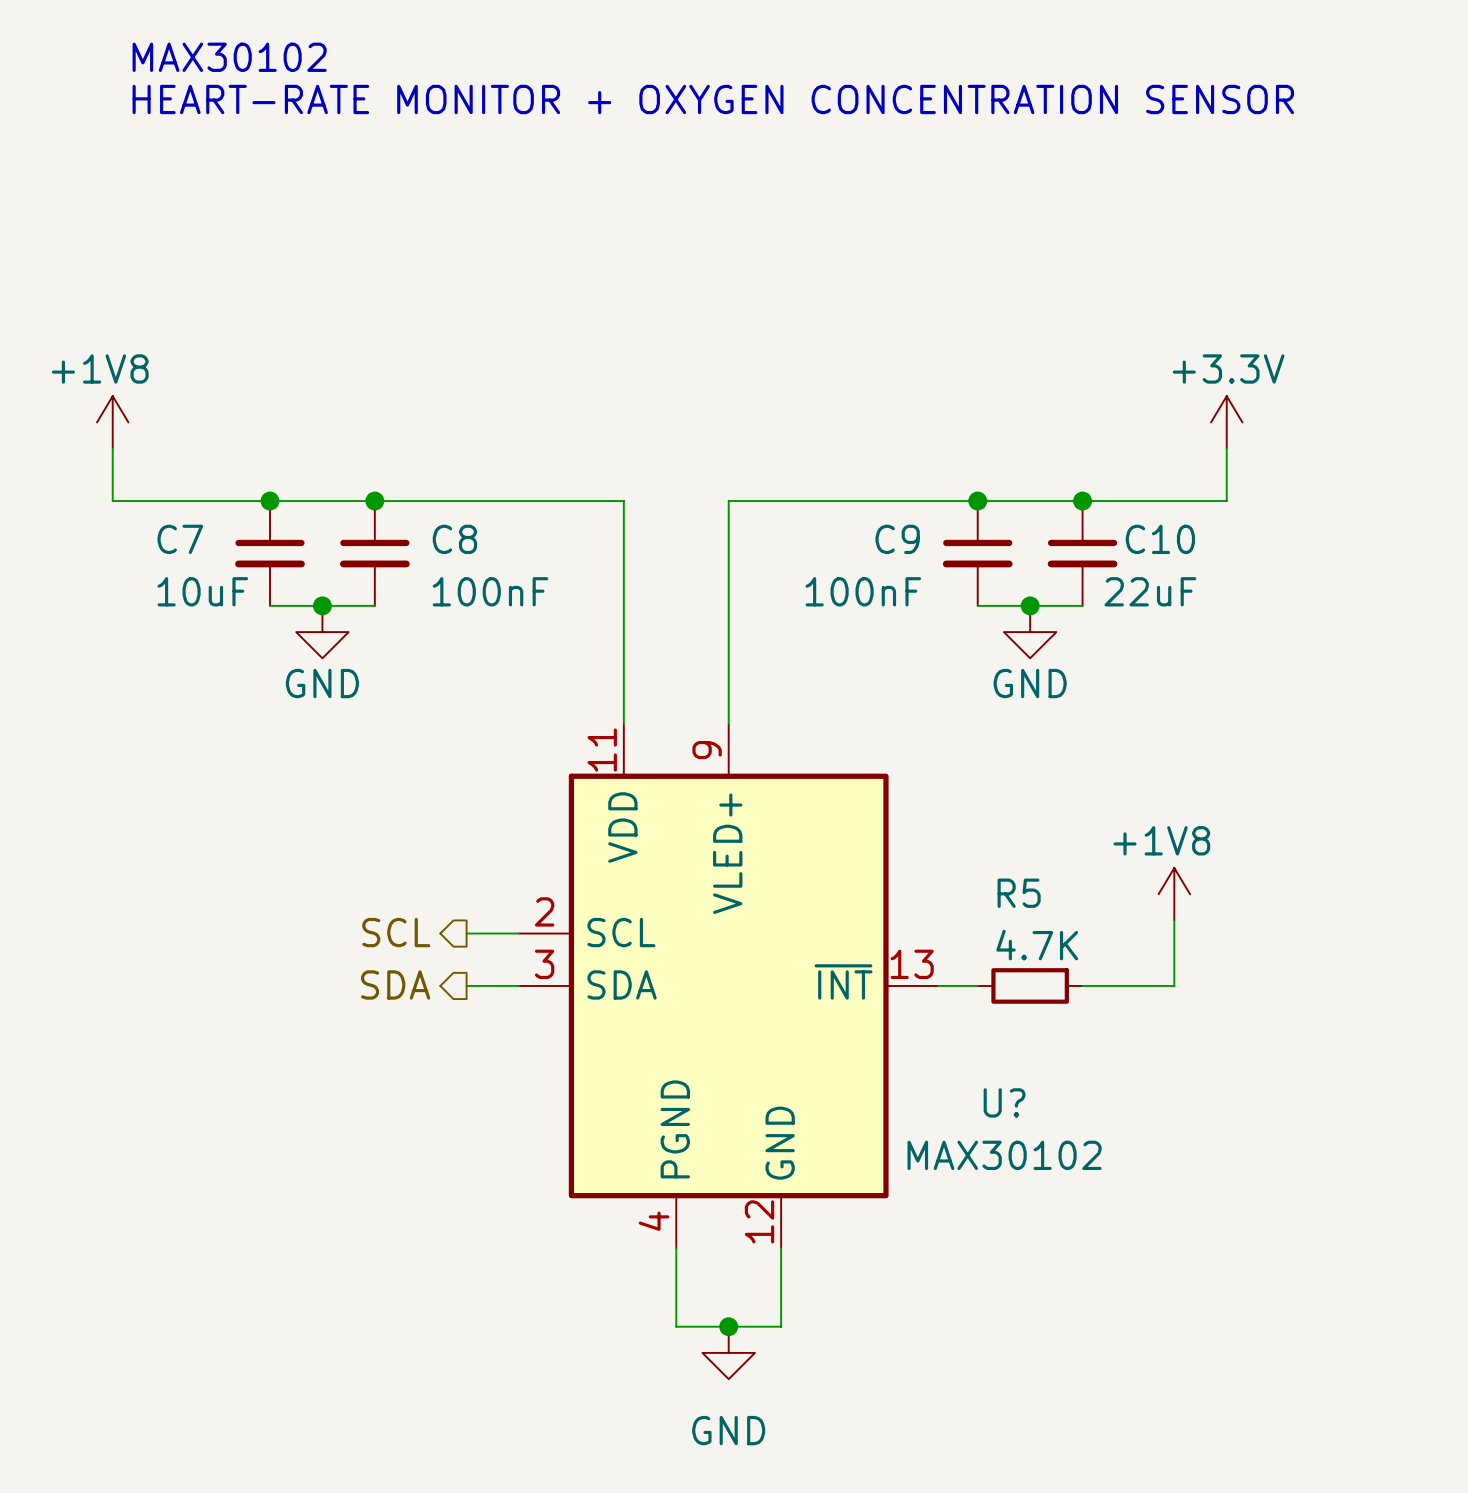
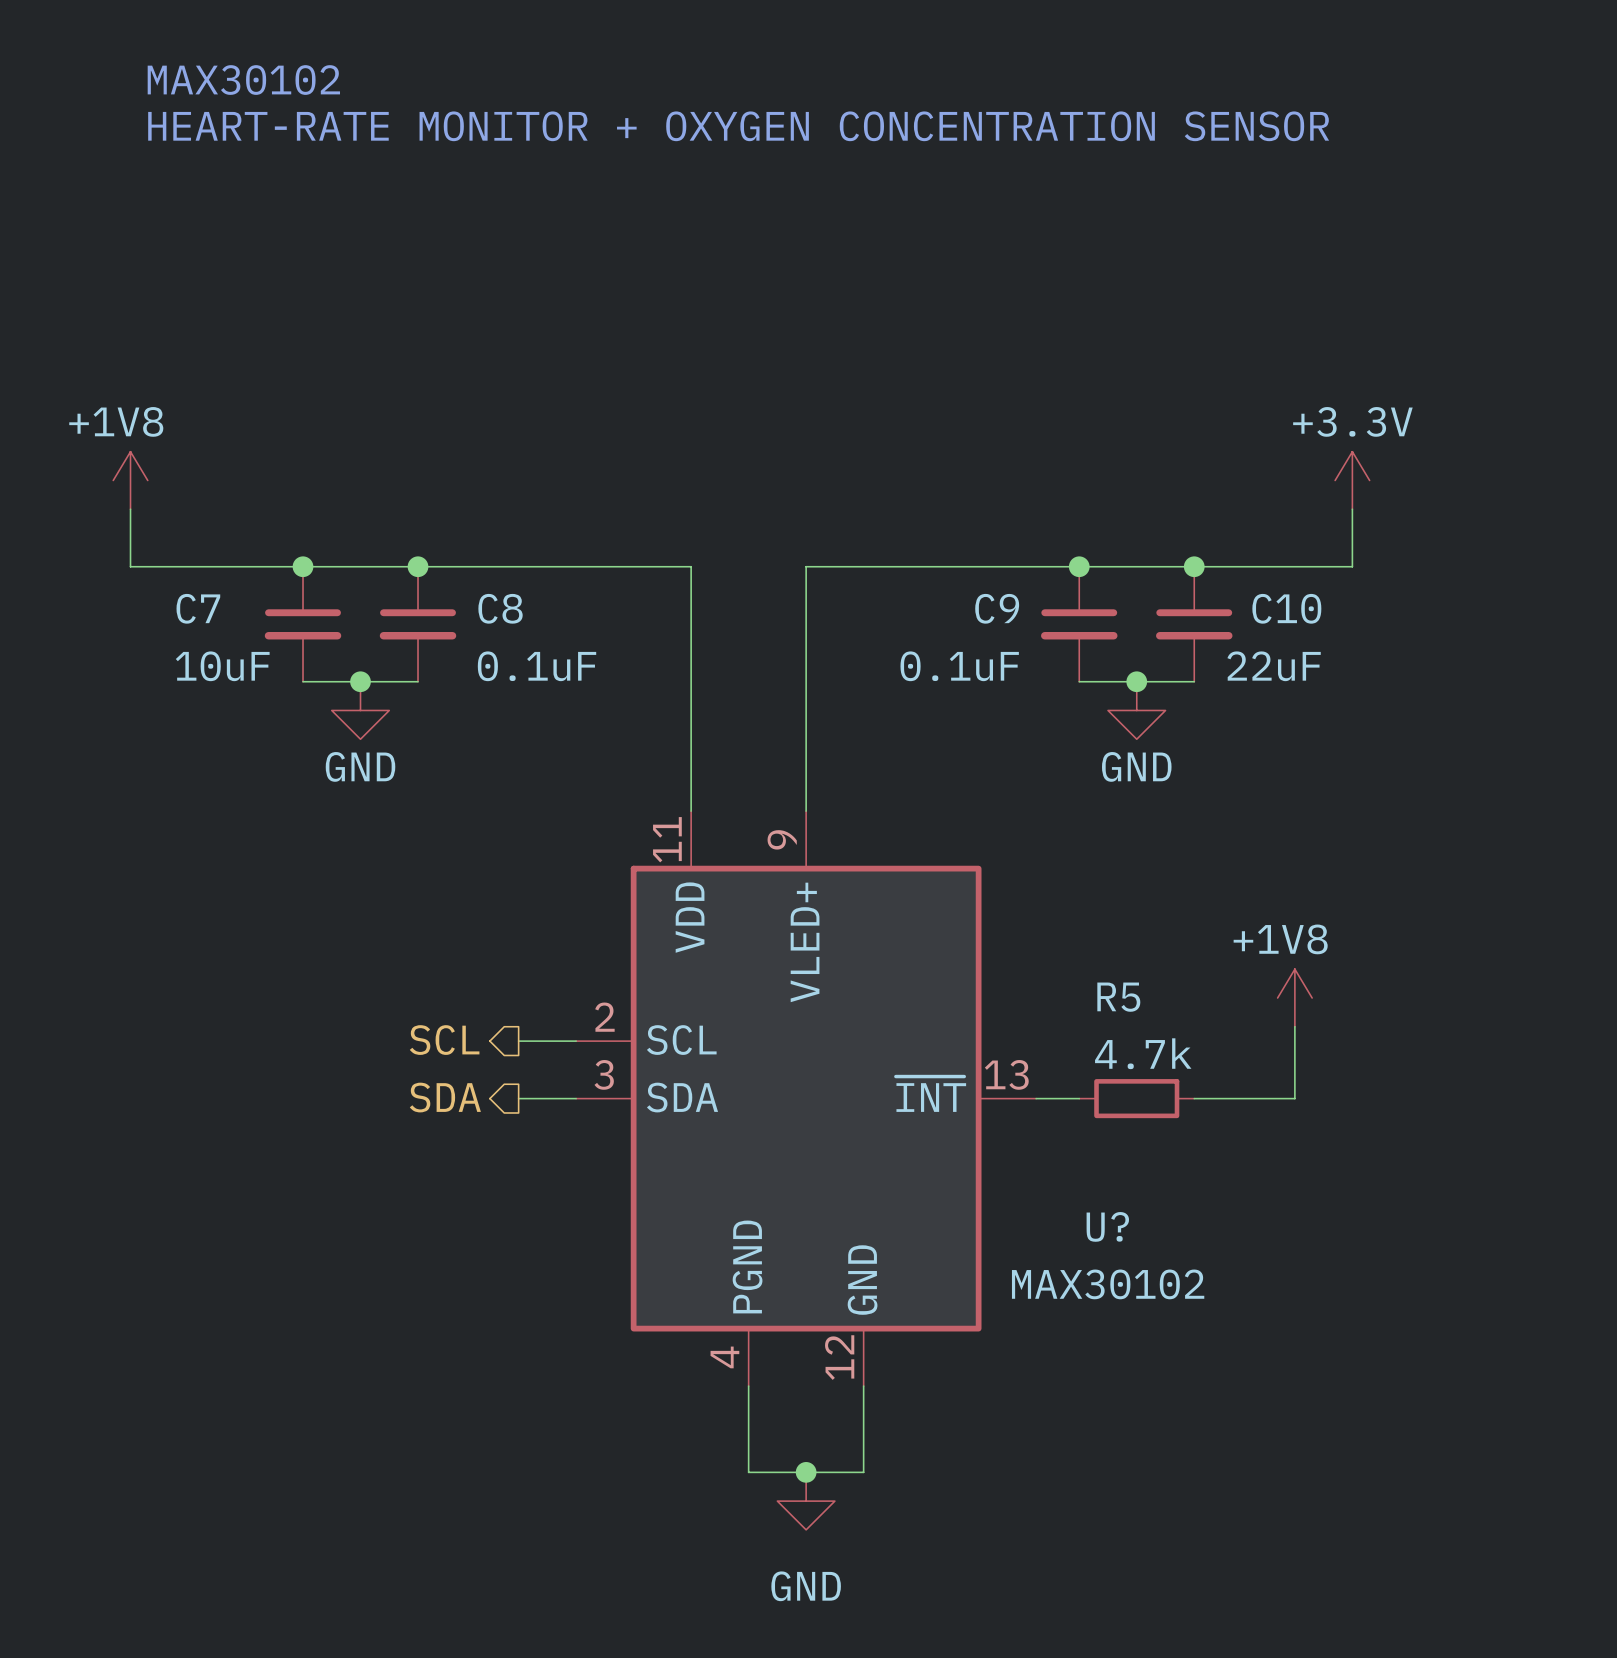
C8 value: 100nF (490, 591) -> 0.1uF (537, 666)
C9 value: 100nF (863, 591) -> 0.1uF (959, 666)
R5 value: 4.7K (1037, 945) -> 4.7k (1143, 1053)

